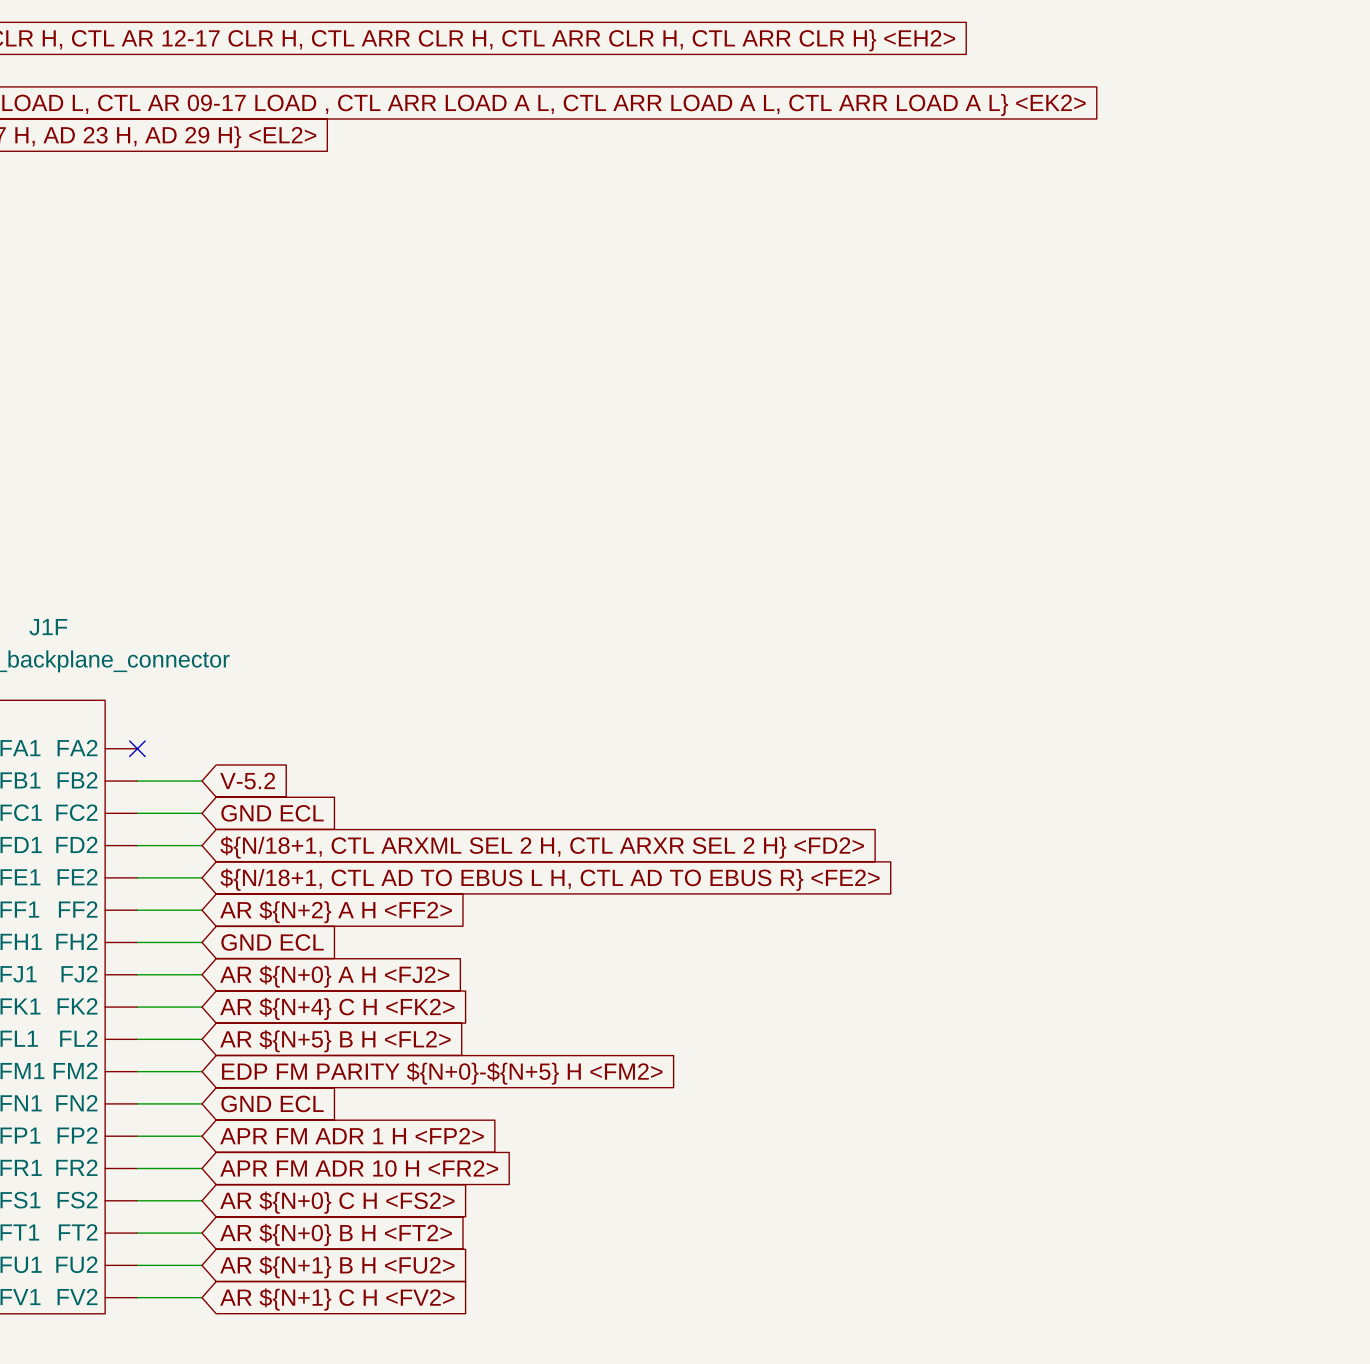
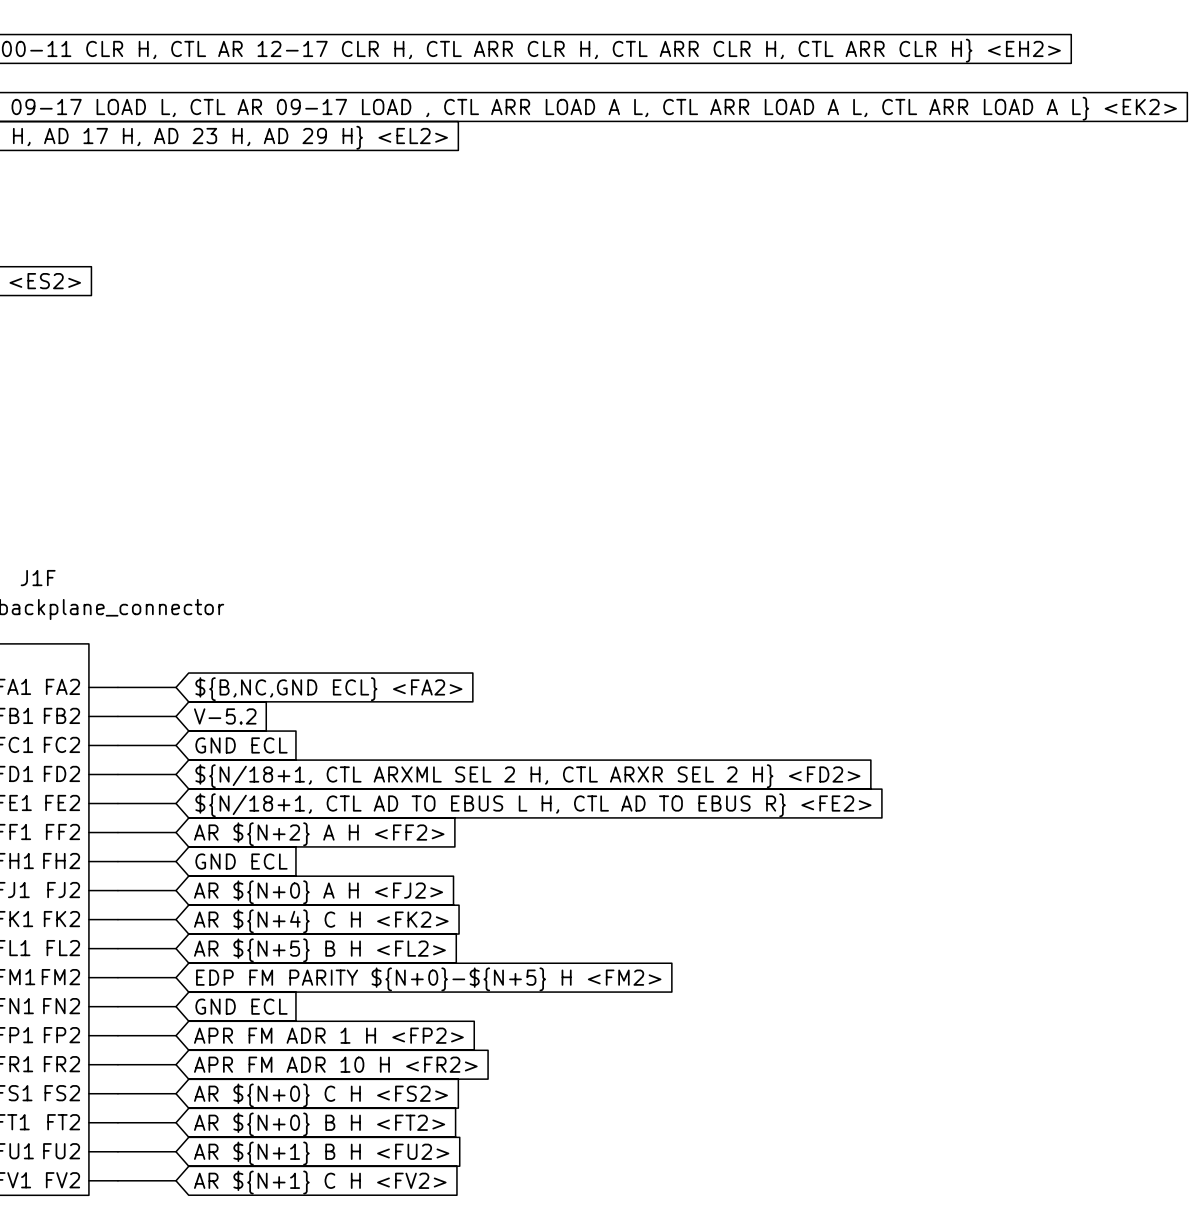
wire: none -> (117, 687) (176, 687)
no-connect mark: (137, 748) -> none
global label: none -> ${B,NC,GND ECL} <FA2> (328, 689)

